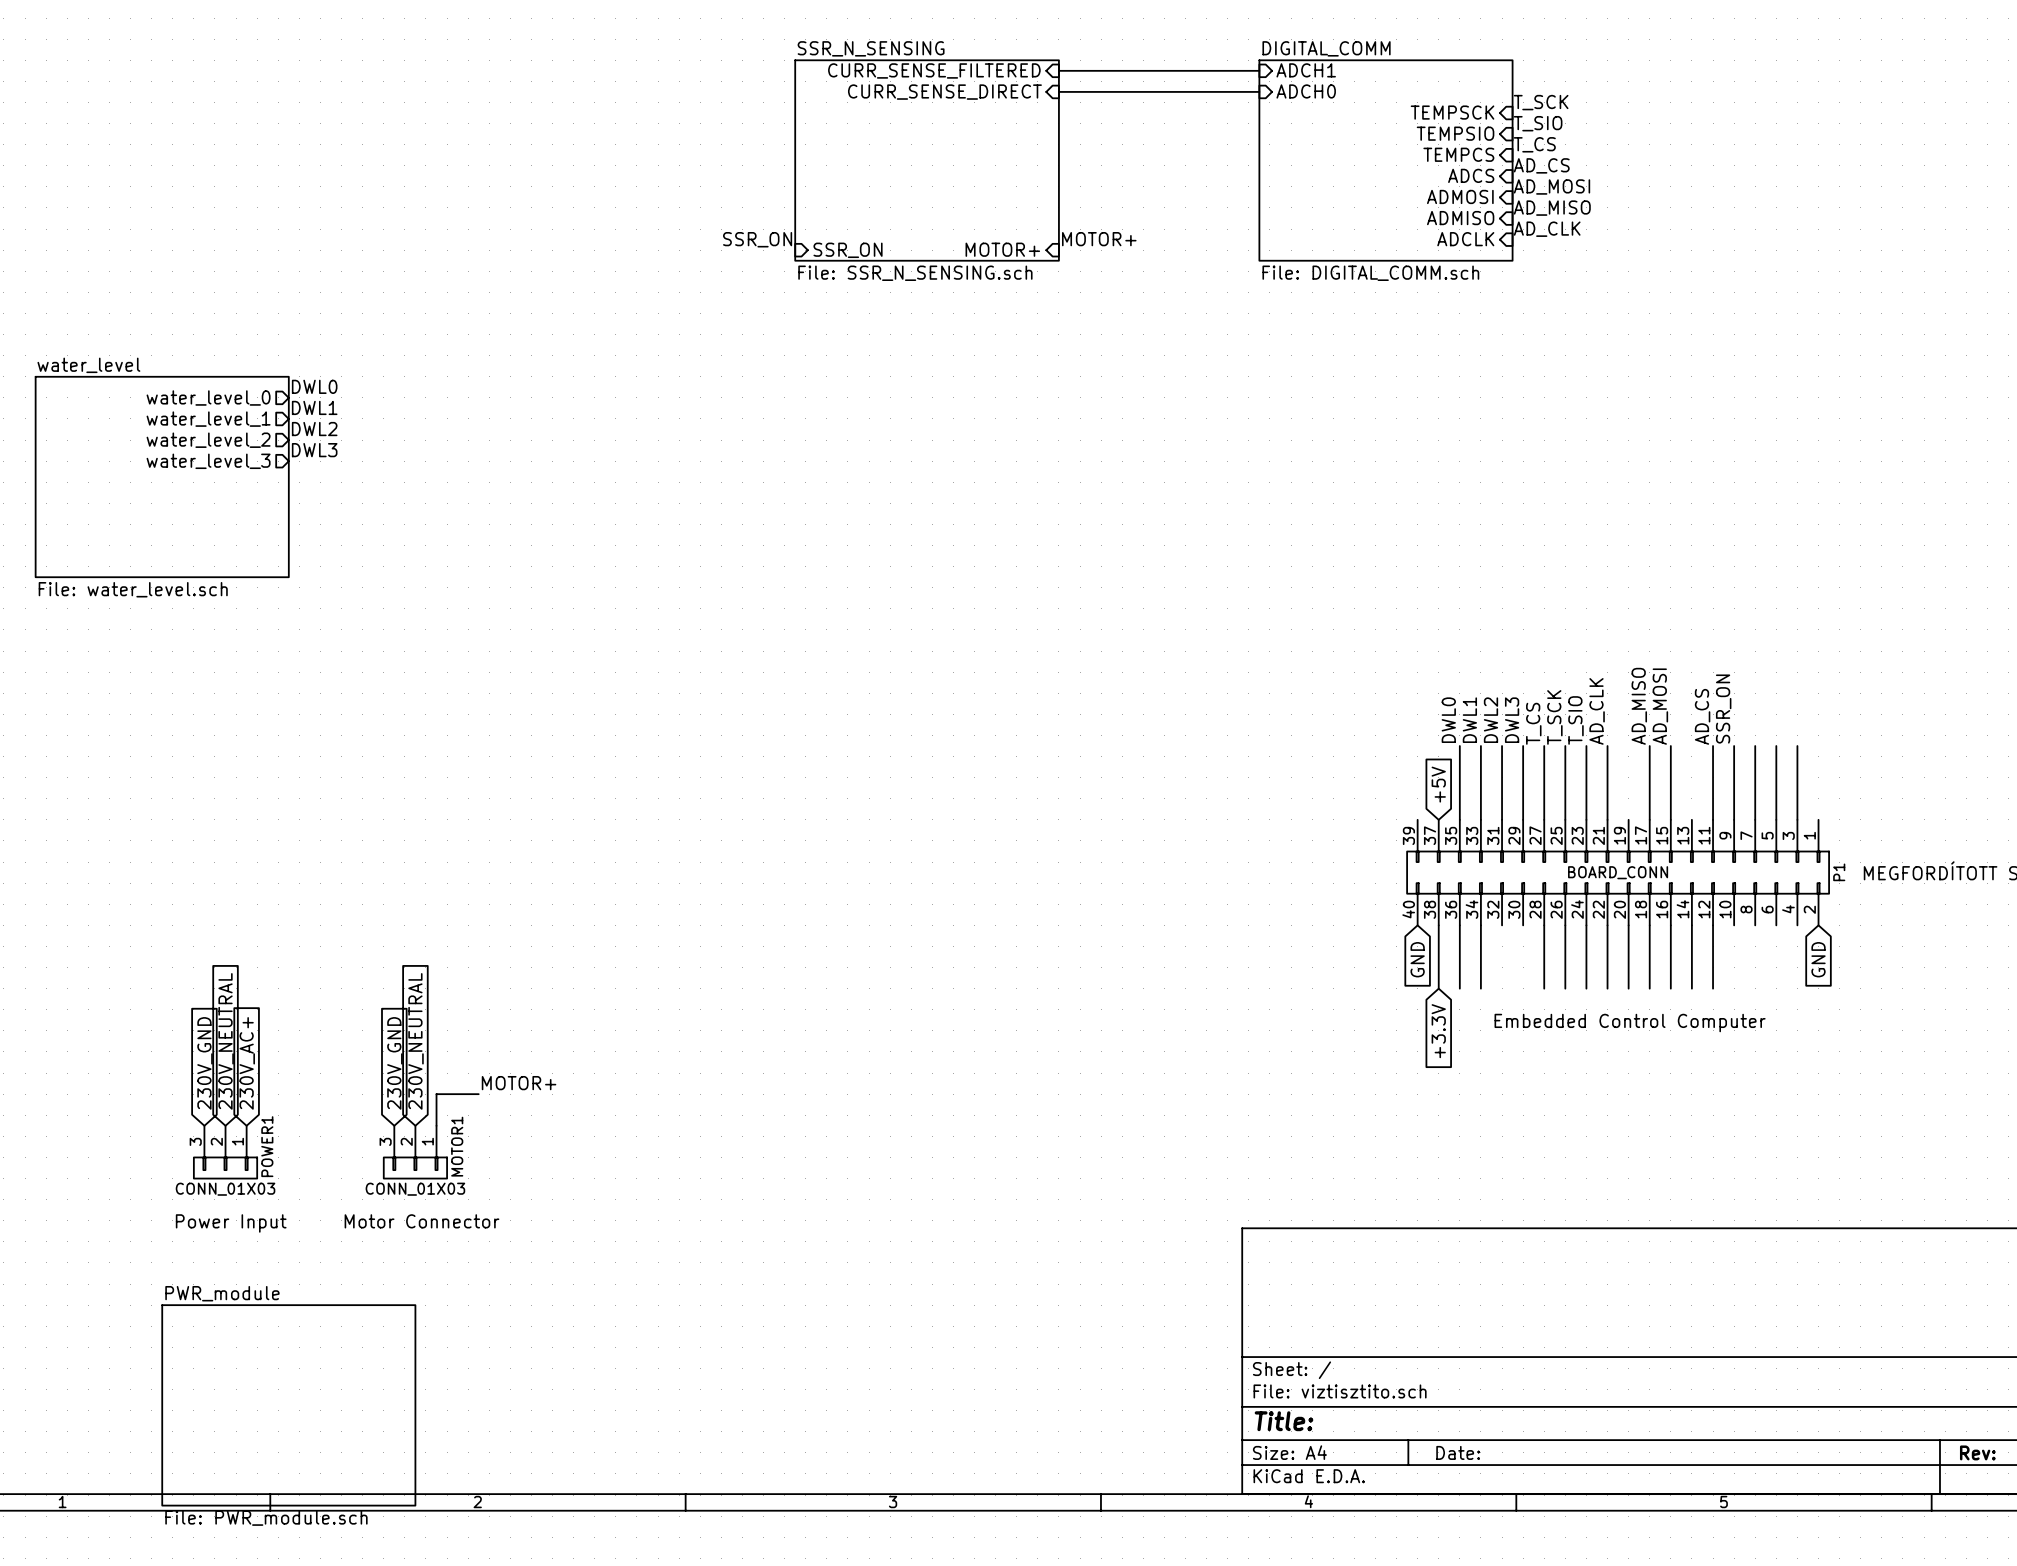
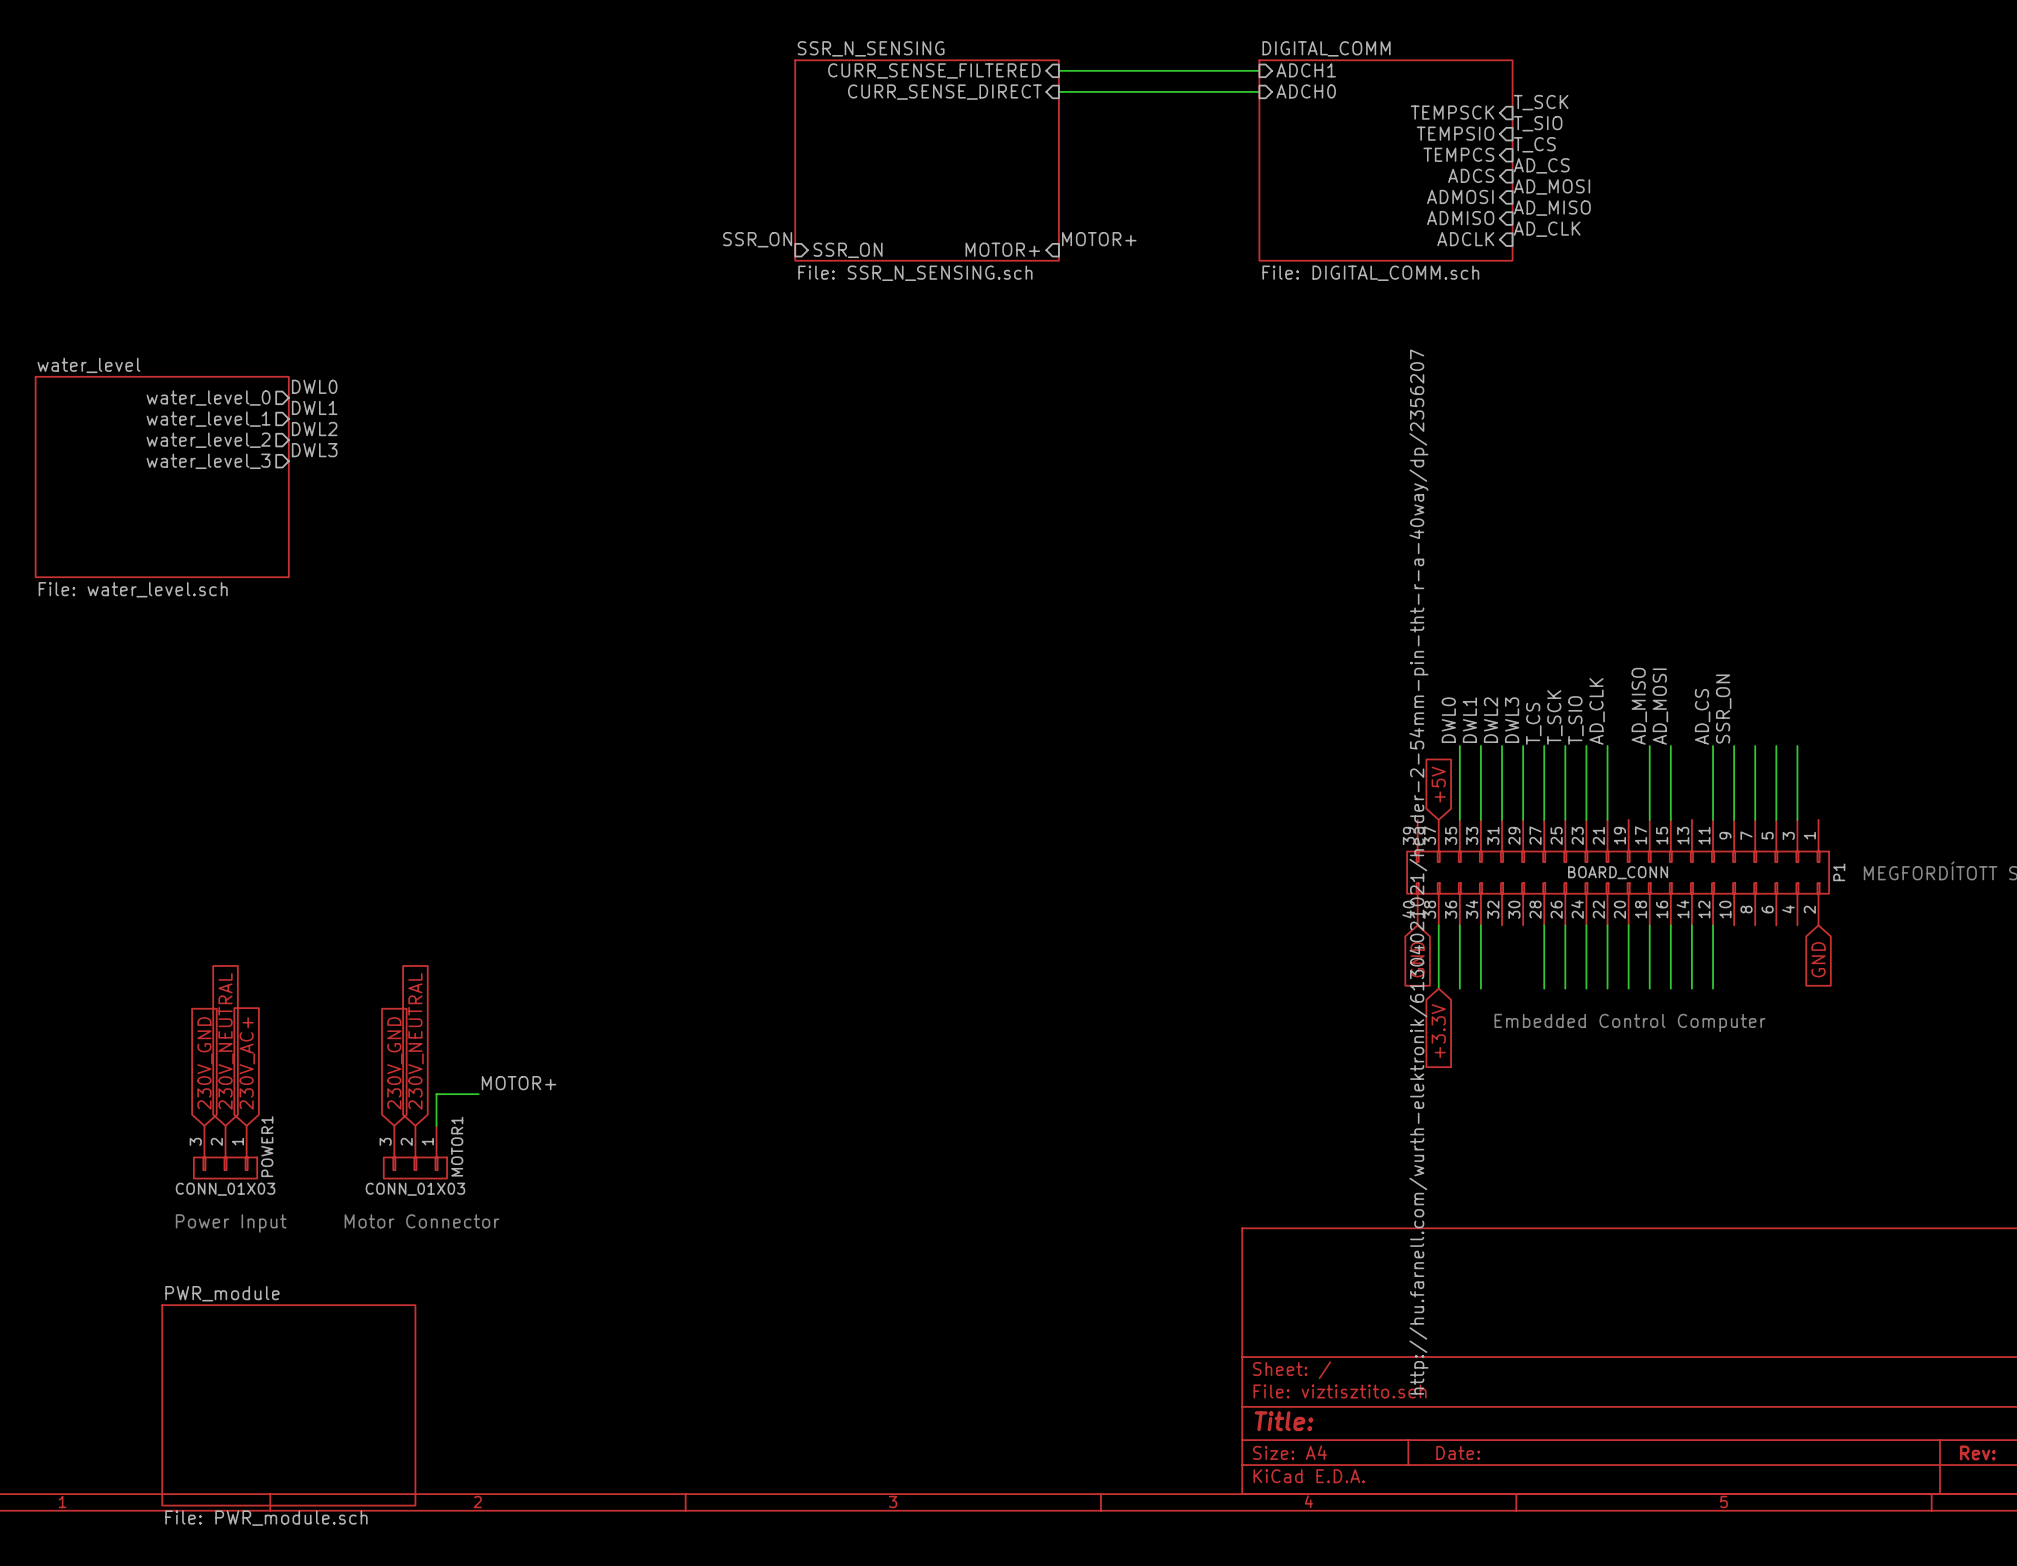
P1 text: none -> http://hu.farnell.com/wurth-elektronik/61304021021/header-2-54mm-pin-tht-r-a-40way/dp/2356207 (1418, 872)

